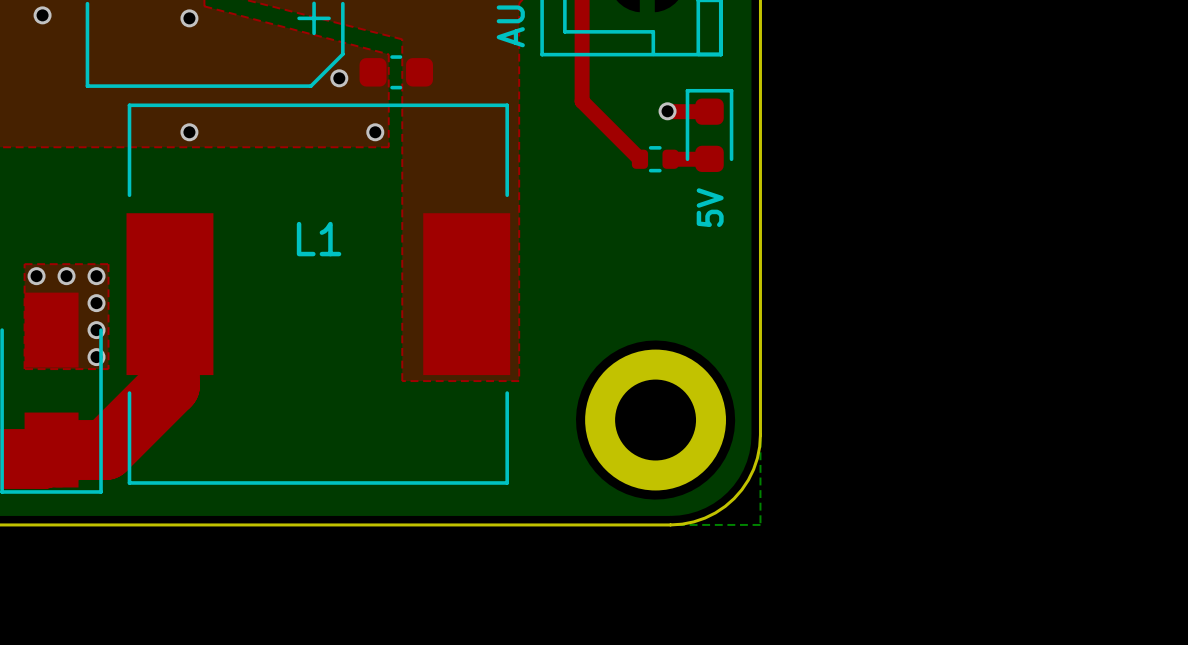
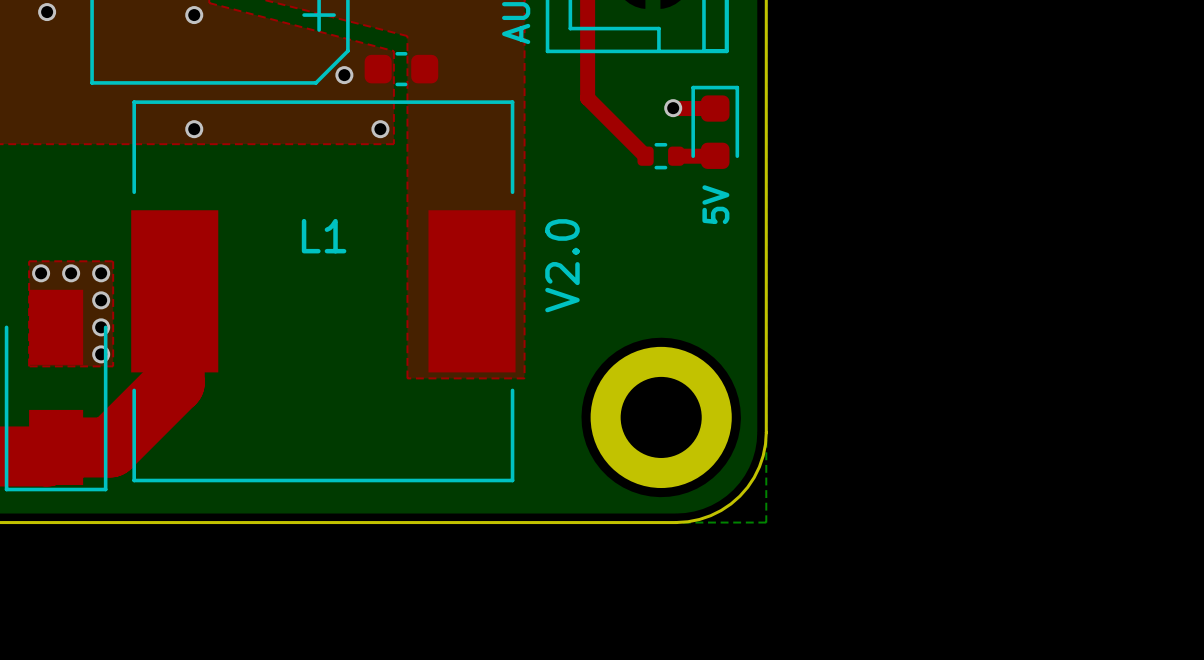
text: none -> V2.0 (562, 265)

